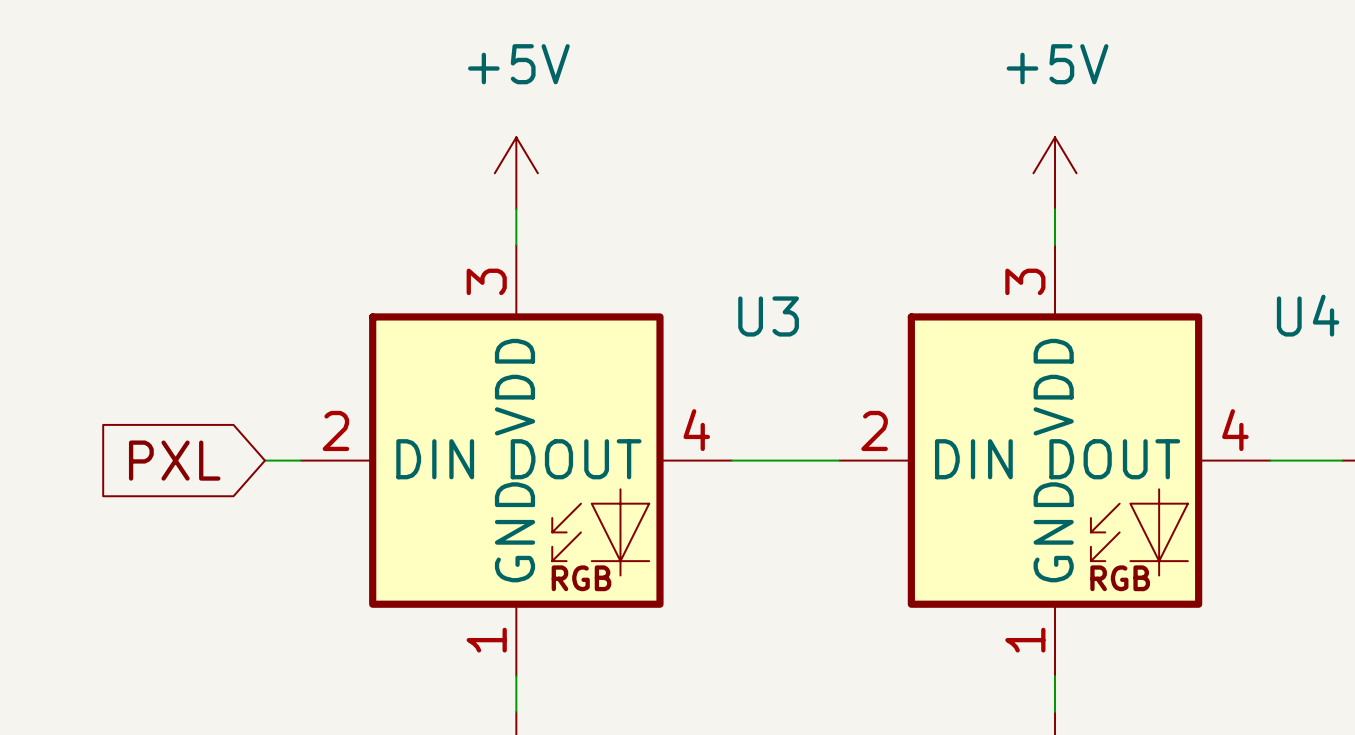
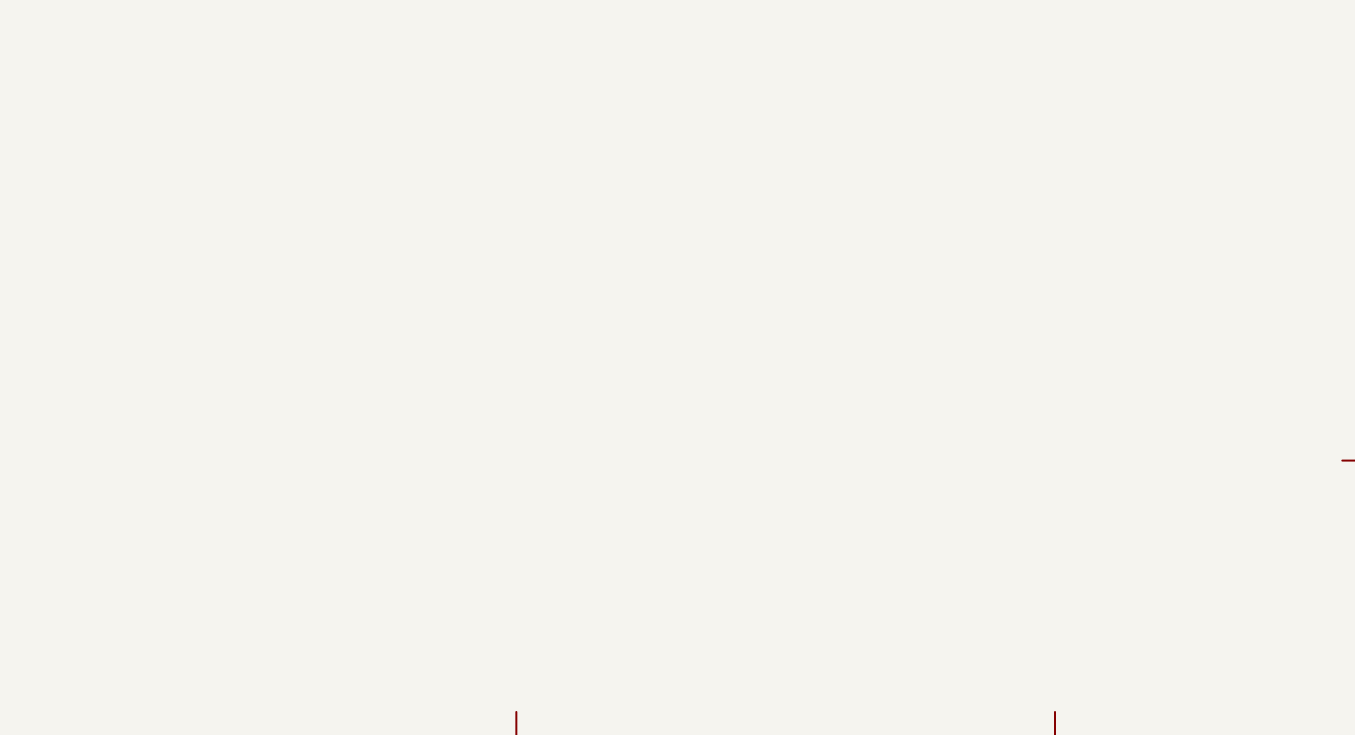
power symbol: +5V (516, 173) -> none
power symbol: +5V (1055, 173) -> none
wire: (516, 209) (516, 245) -> none
wire: (1055, 209) (1055, 245) -> none
global label: PXL (174, 460) -> none
wire: (264, 460) (300, 460) -> none
U3: (516, 460) -> none
wire: (731, 460) (839, 460) -> none
U4: (1055, 460) -> none
wire: (1270, 460) (1342, 460) -> none
wire: (516, 676) (516, 711) -> none
wire: (1055, 676) (1055, 711) -> none

